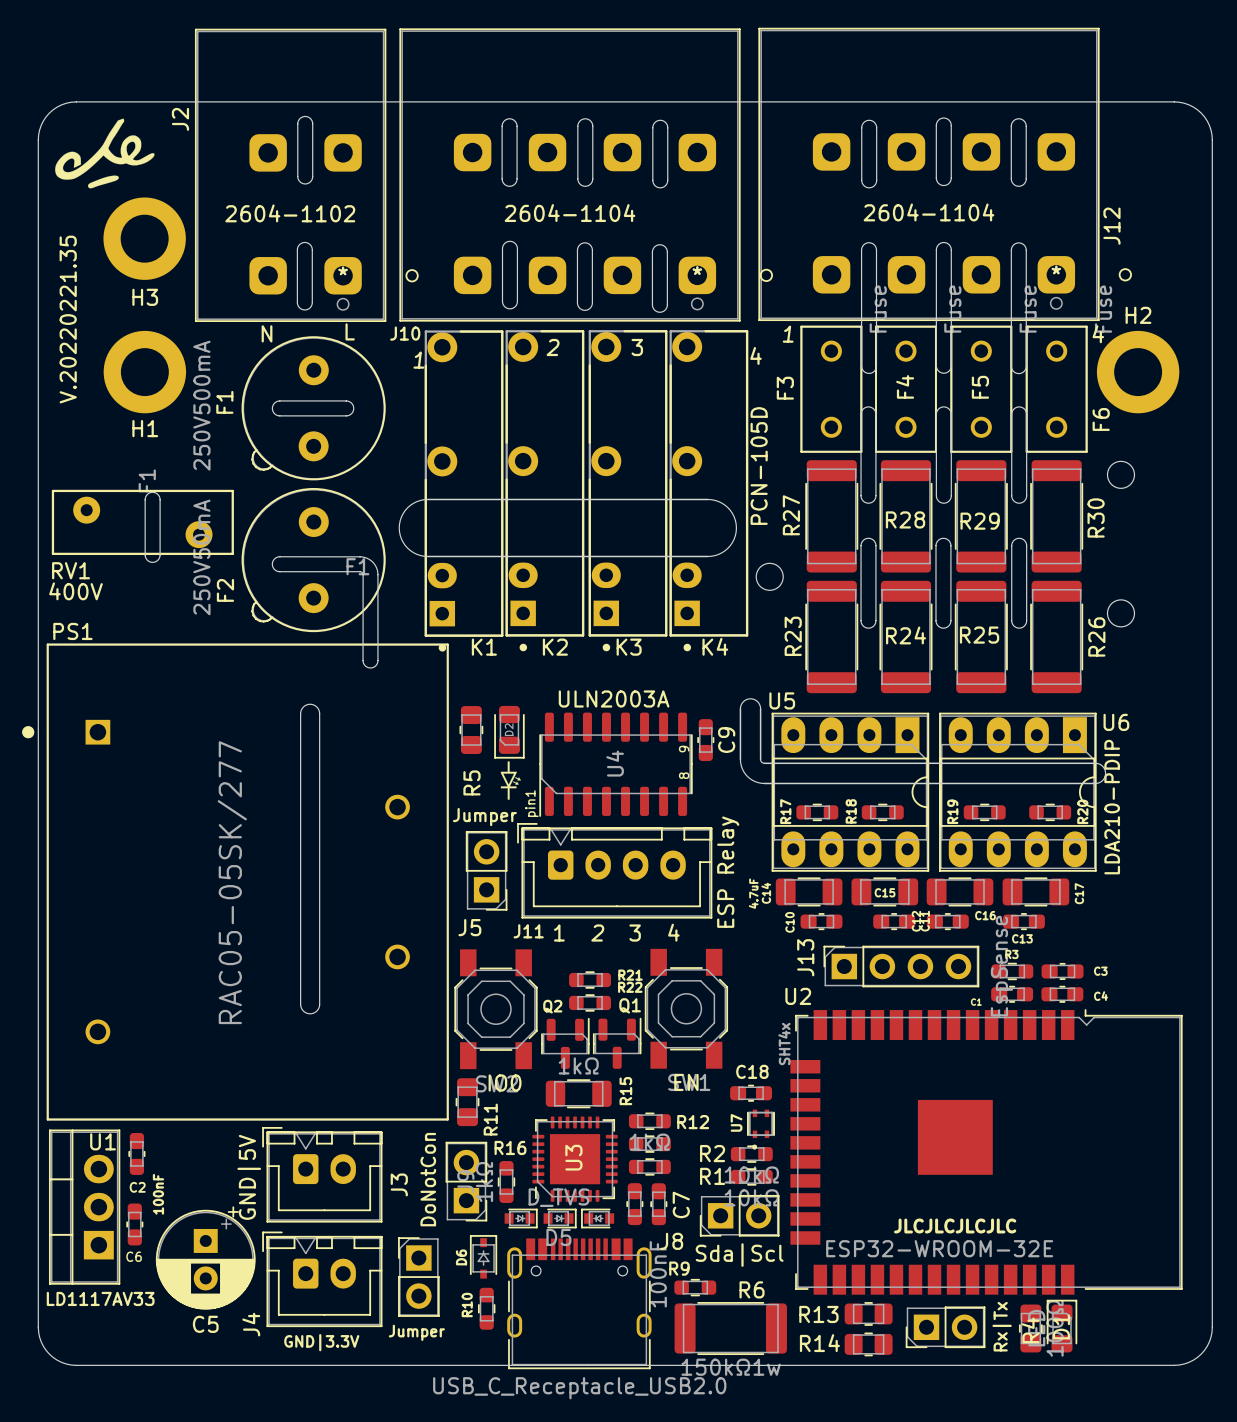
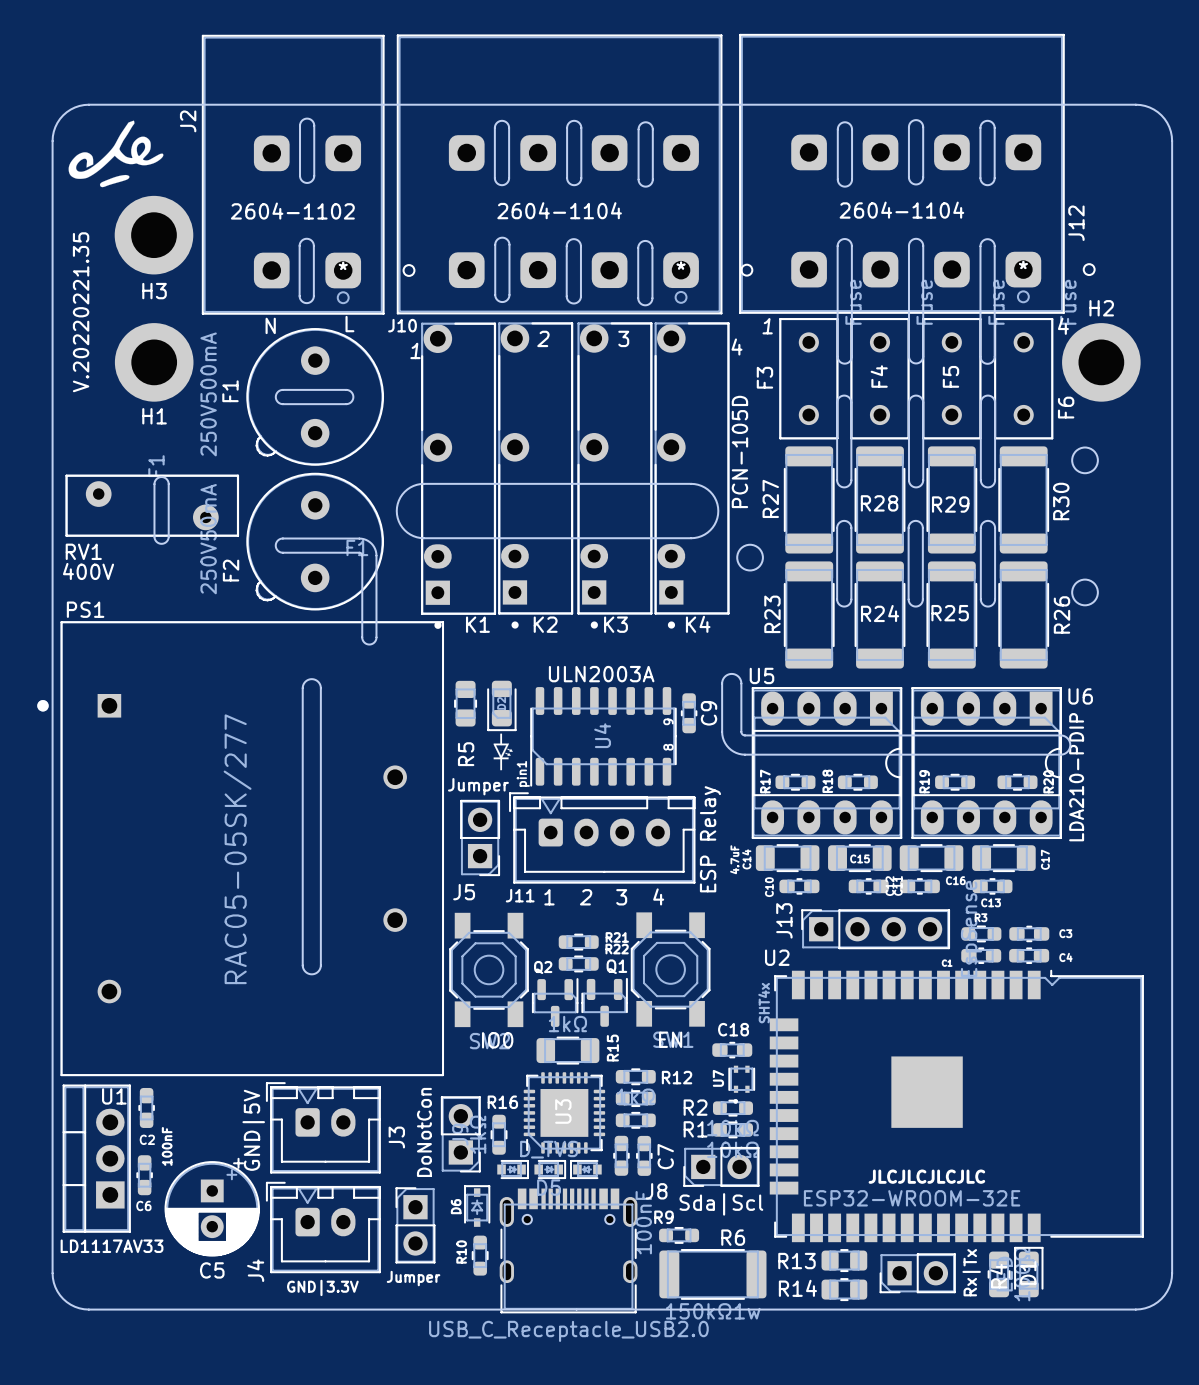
R11: (467, 1102) -> none

